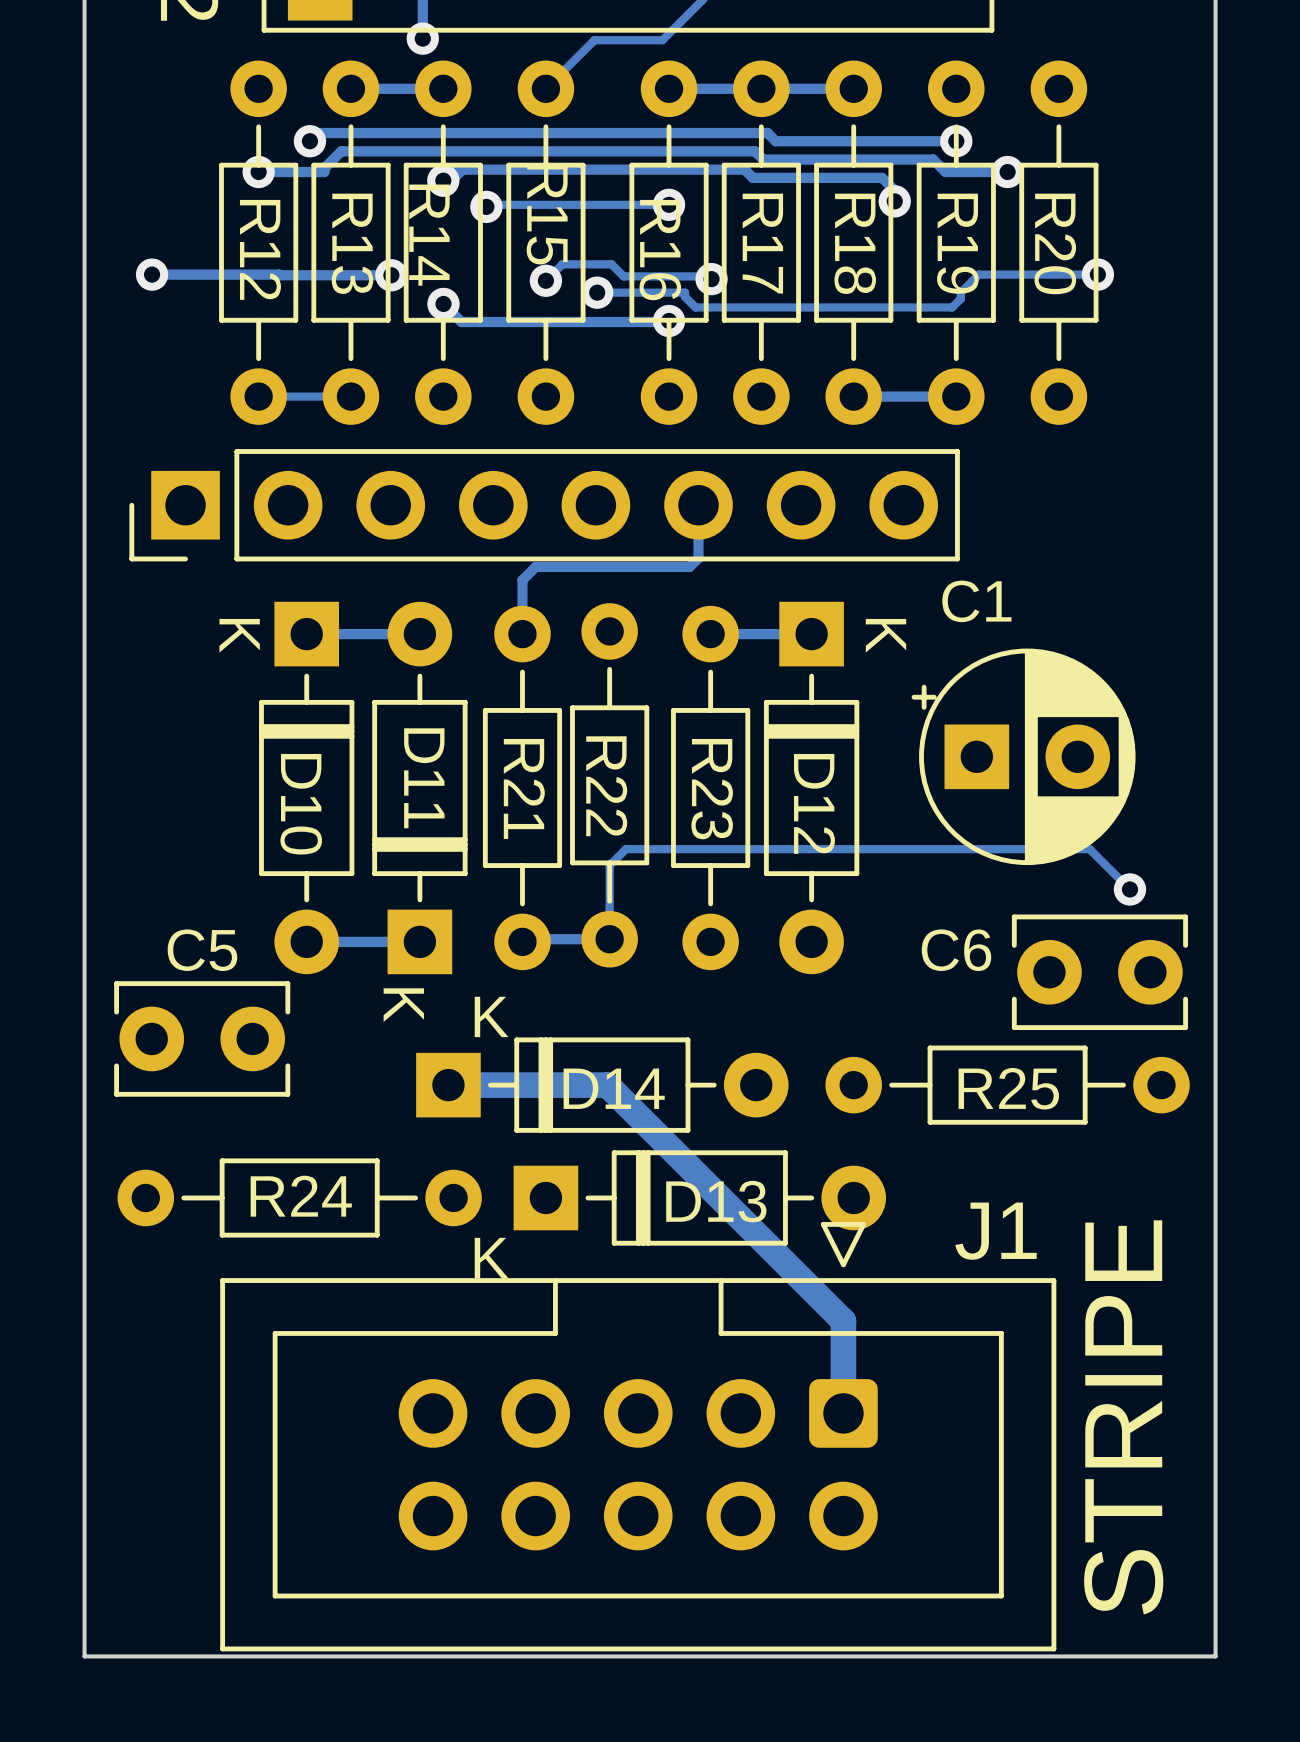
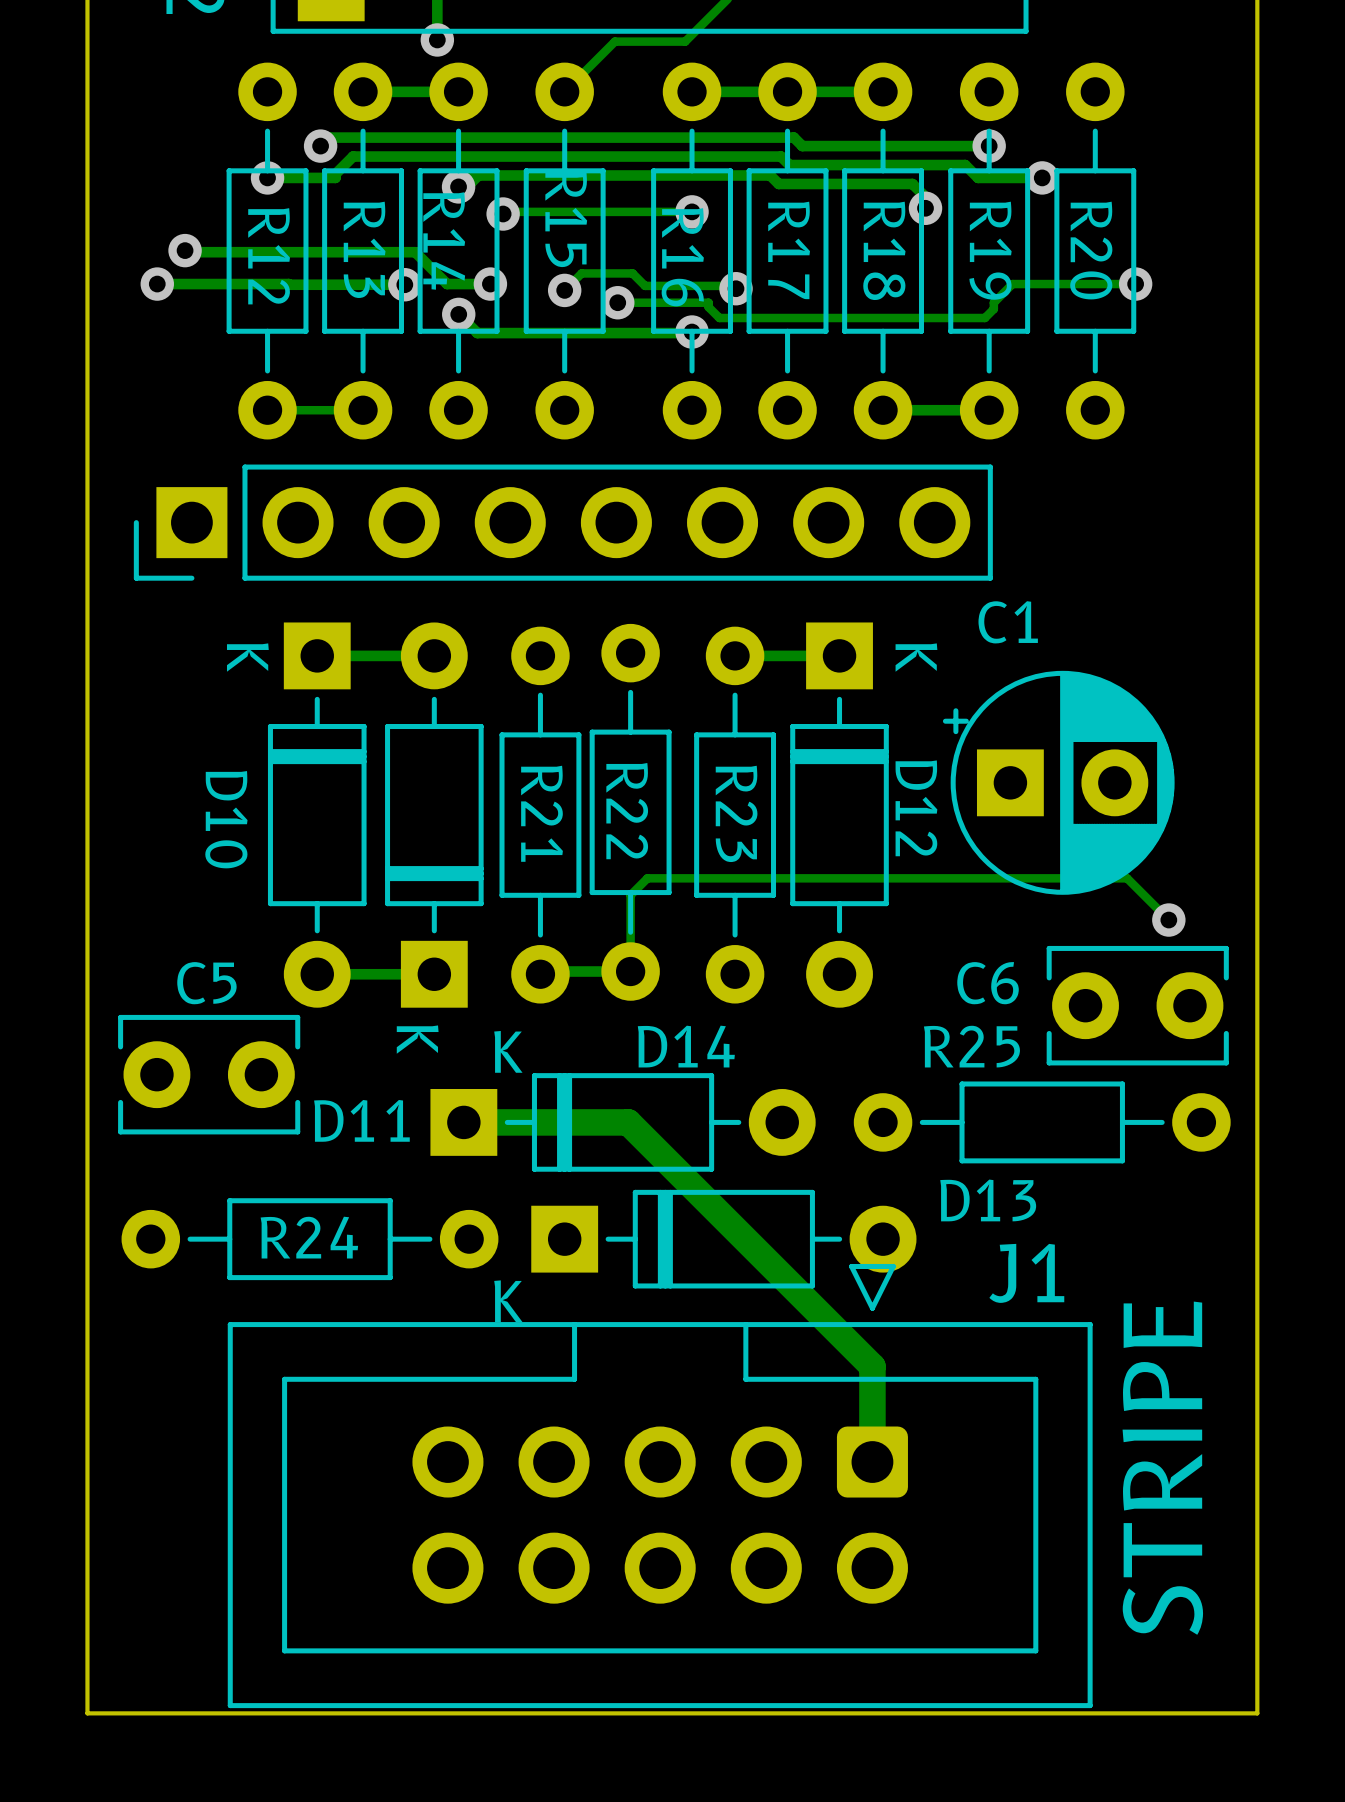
track: none -> (185, 250) (186, 252) (415, 252) (447, 284) (490, 284)
via: none -> (185, 250)
via: none -> (490, 284)
track: (698, 505) (698, 558) (689, 567) (535, 567) (522, 580) (522, 634) -> none
D11 name rotation: 0° (424, 778) -> 90° counterclockwise (361, 1120)
D11 name position: D11 (424, 778) -> D11 (361, 1120)
D12 name position: D12 (814, 803) -> D12 (916, 808)
D10 name position: D10 (301, 804) -> D10 (226, 819)
D14 name position: D14 (614, 1088) -> D14 (686, 1046)
R25 name position: R25 (1008, 1088) -> R25 (971, 1046)
D13 name position: D13 (716, 1201) -> D13 (988, 1200)

